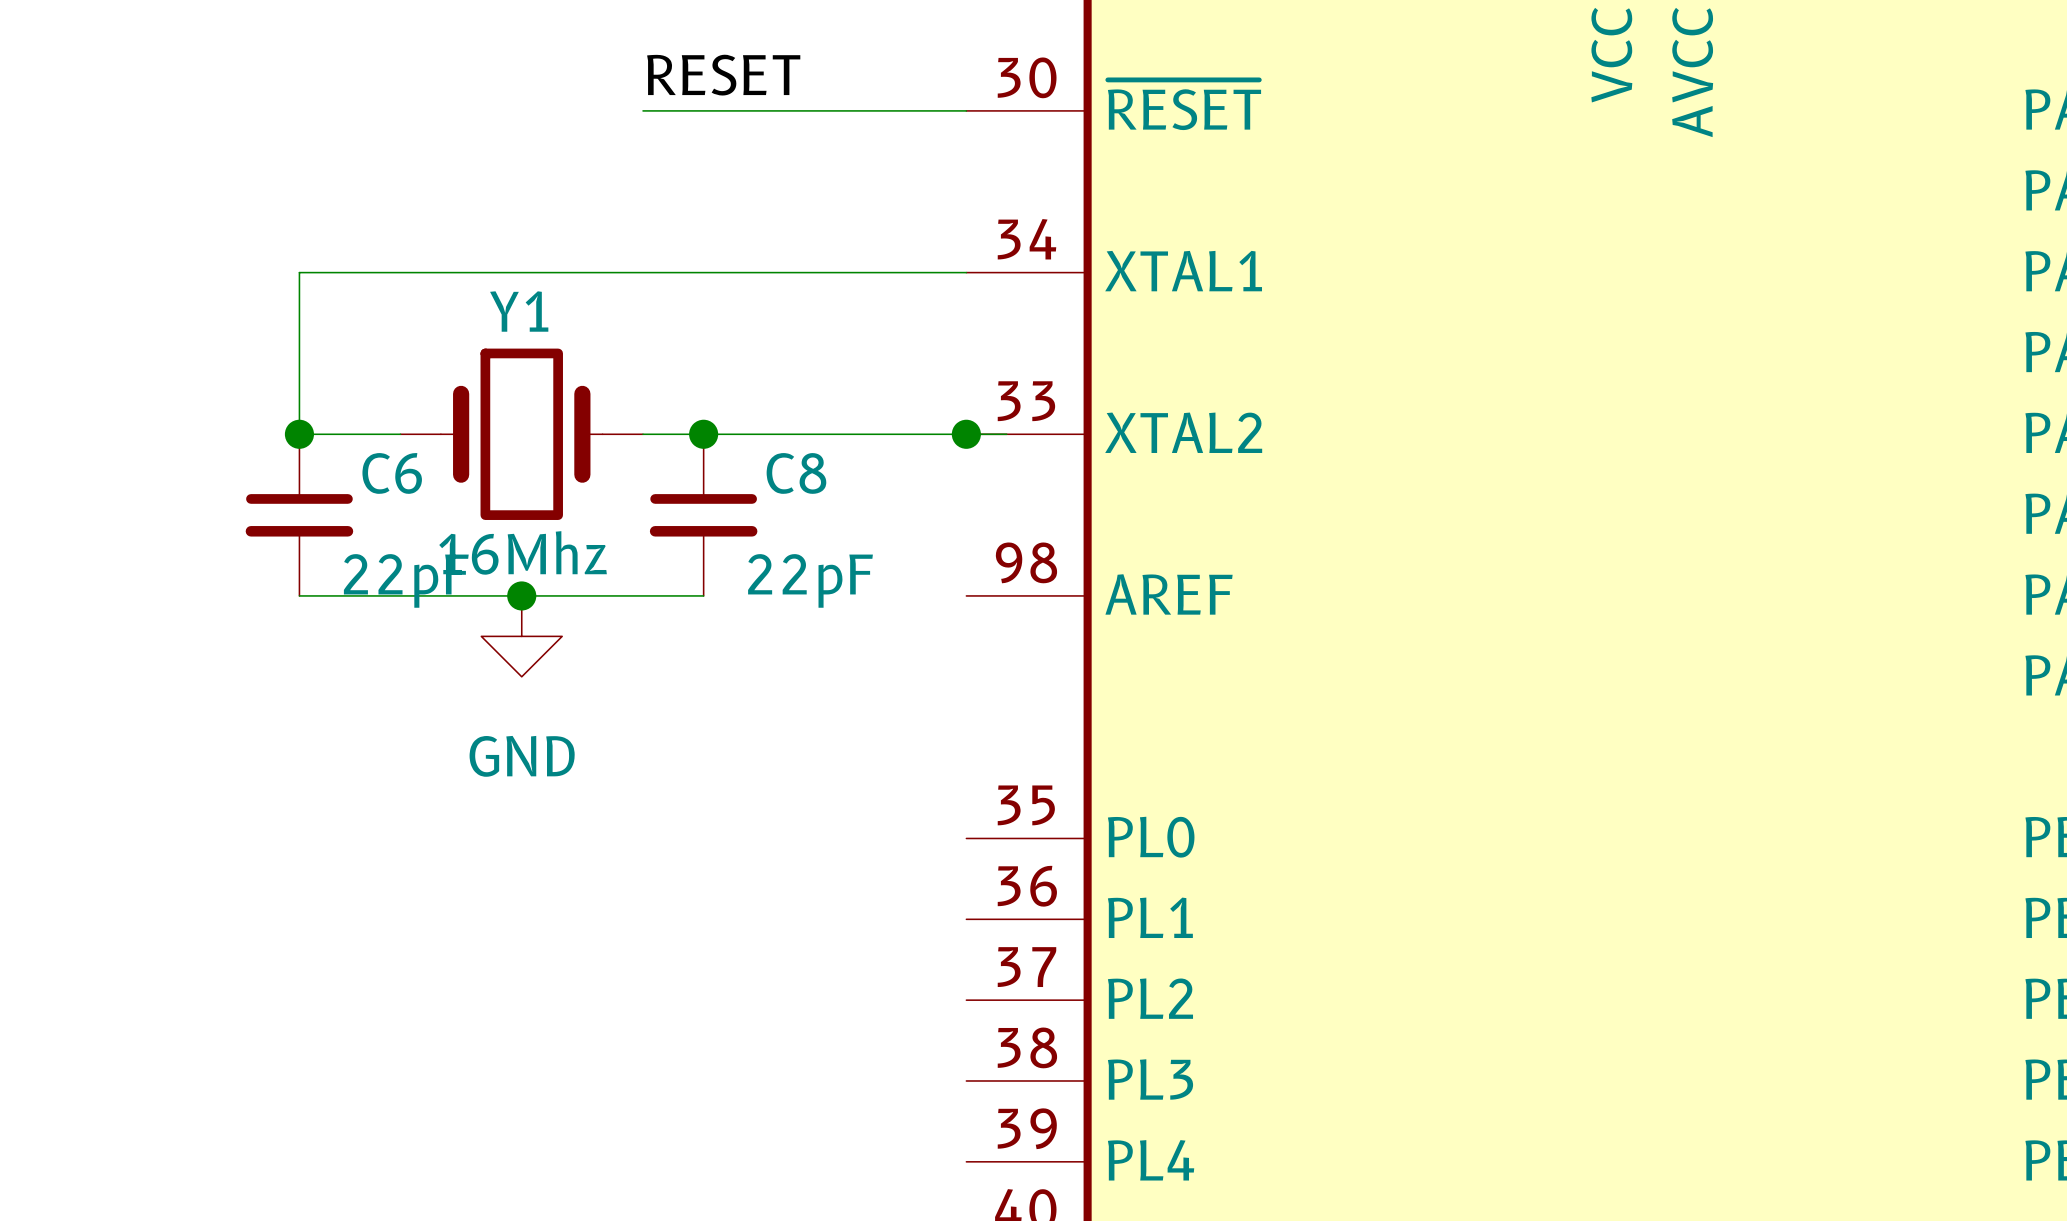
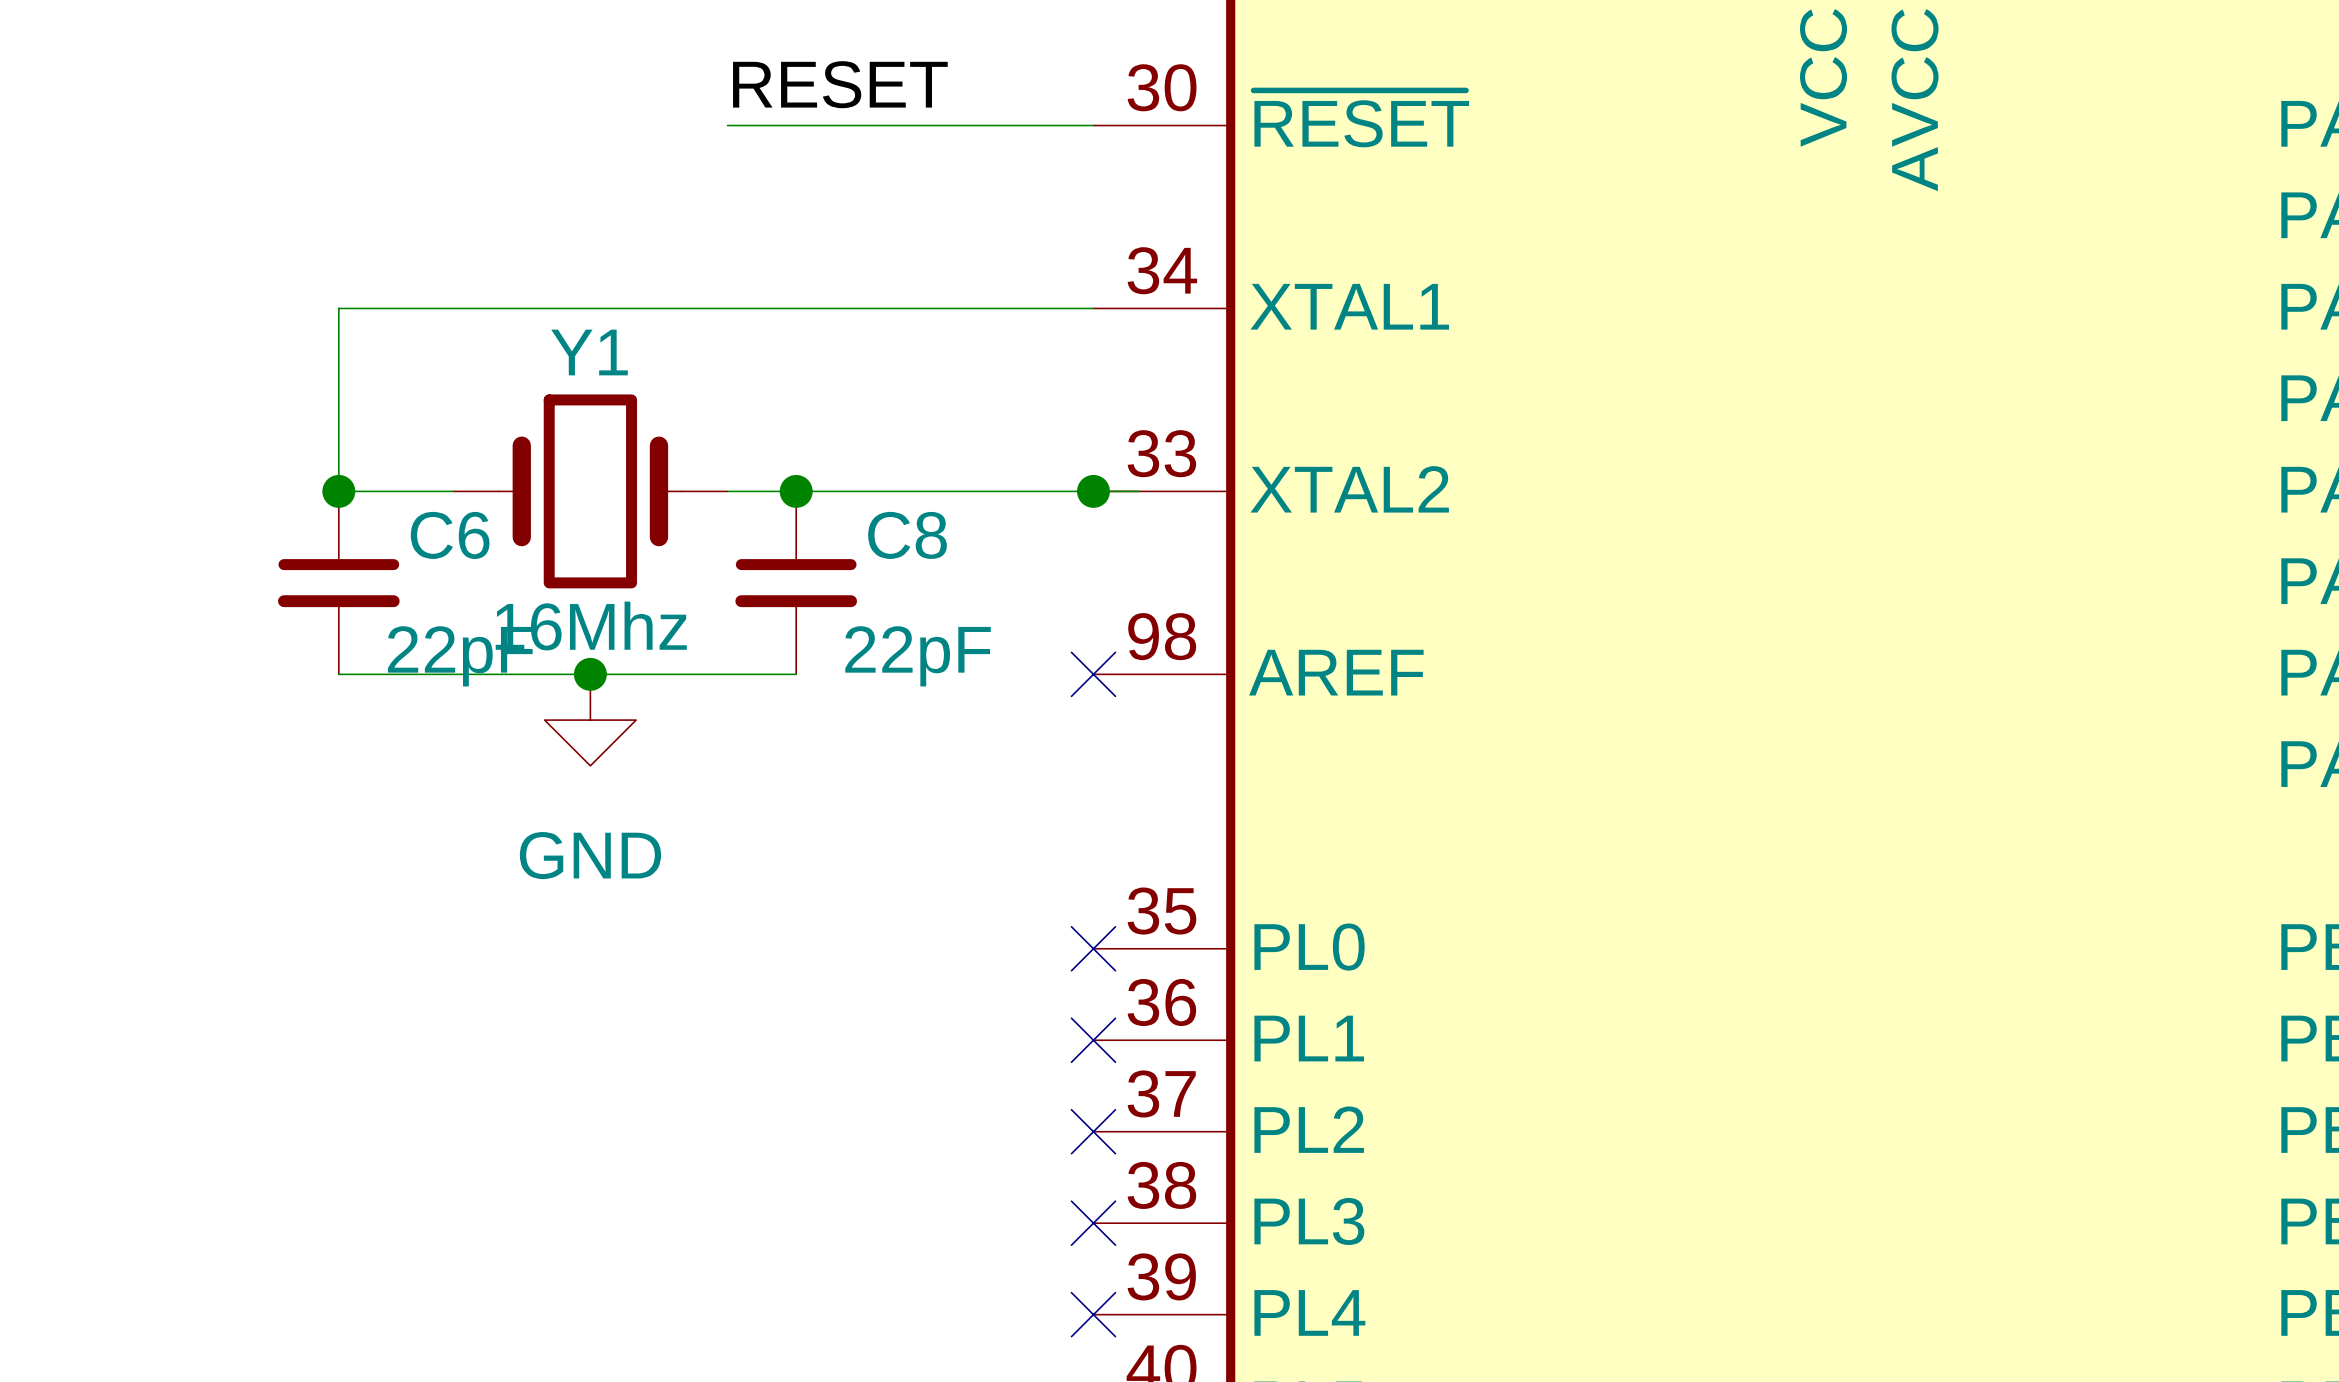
no-connect mark: none -> (1093, 674)
no-connect mark: none -> (1093, 948)
no-connect mark: none -> (1093, 1040)
no-connect mark: none -> (1093, 1131)
no-connect mark: none -> (1093, 1223)
no-connect mark: none -> (1093, 1314)

